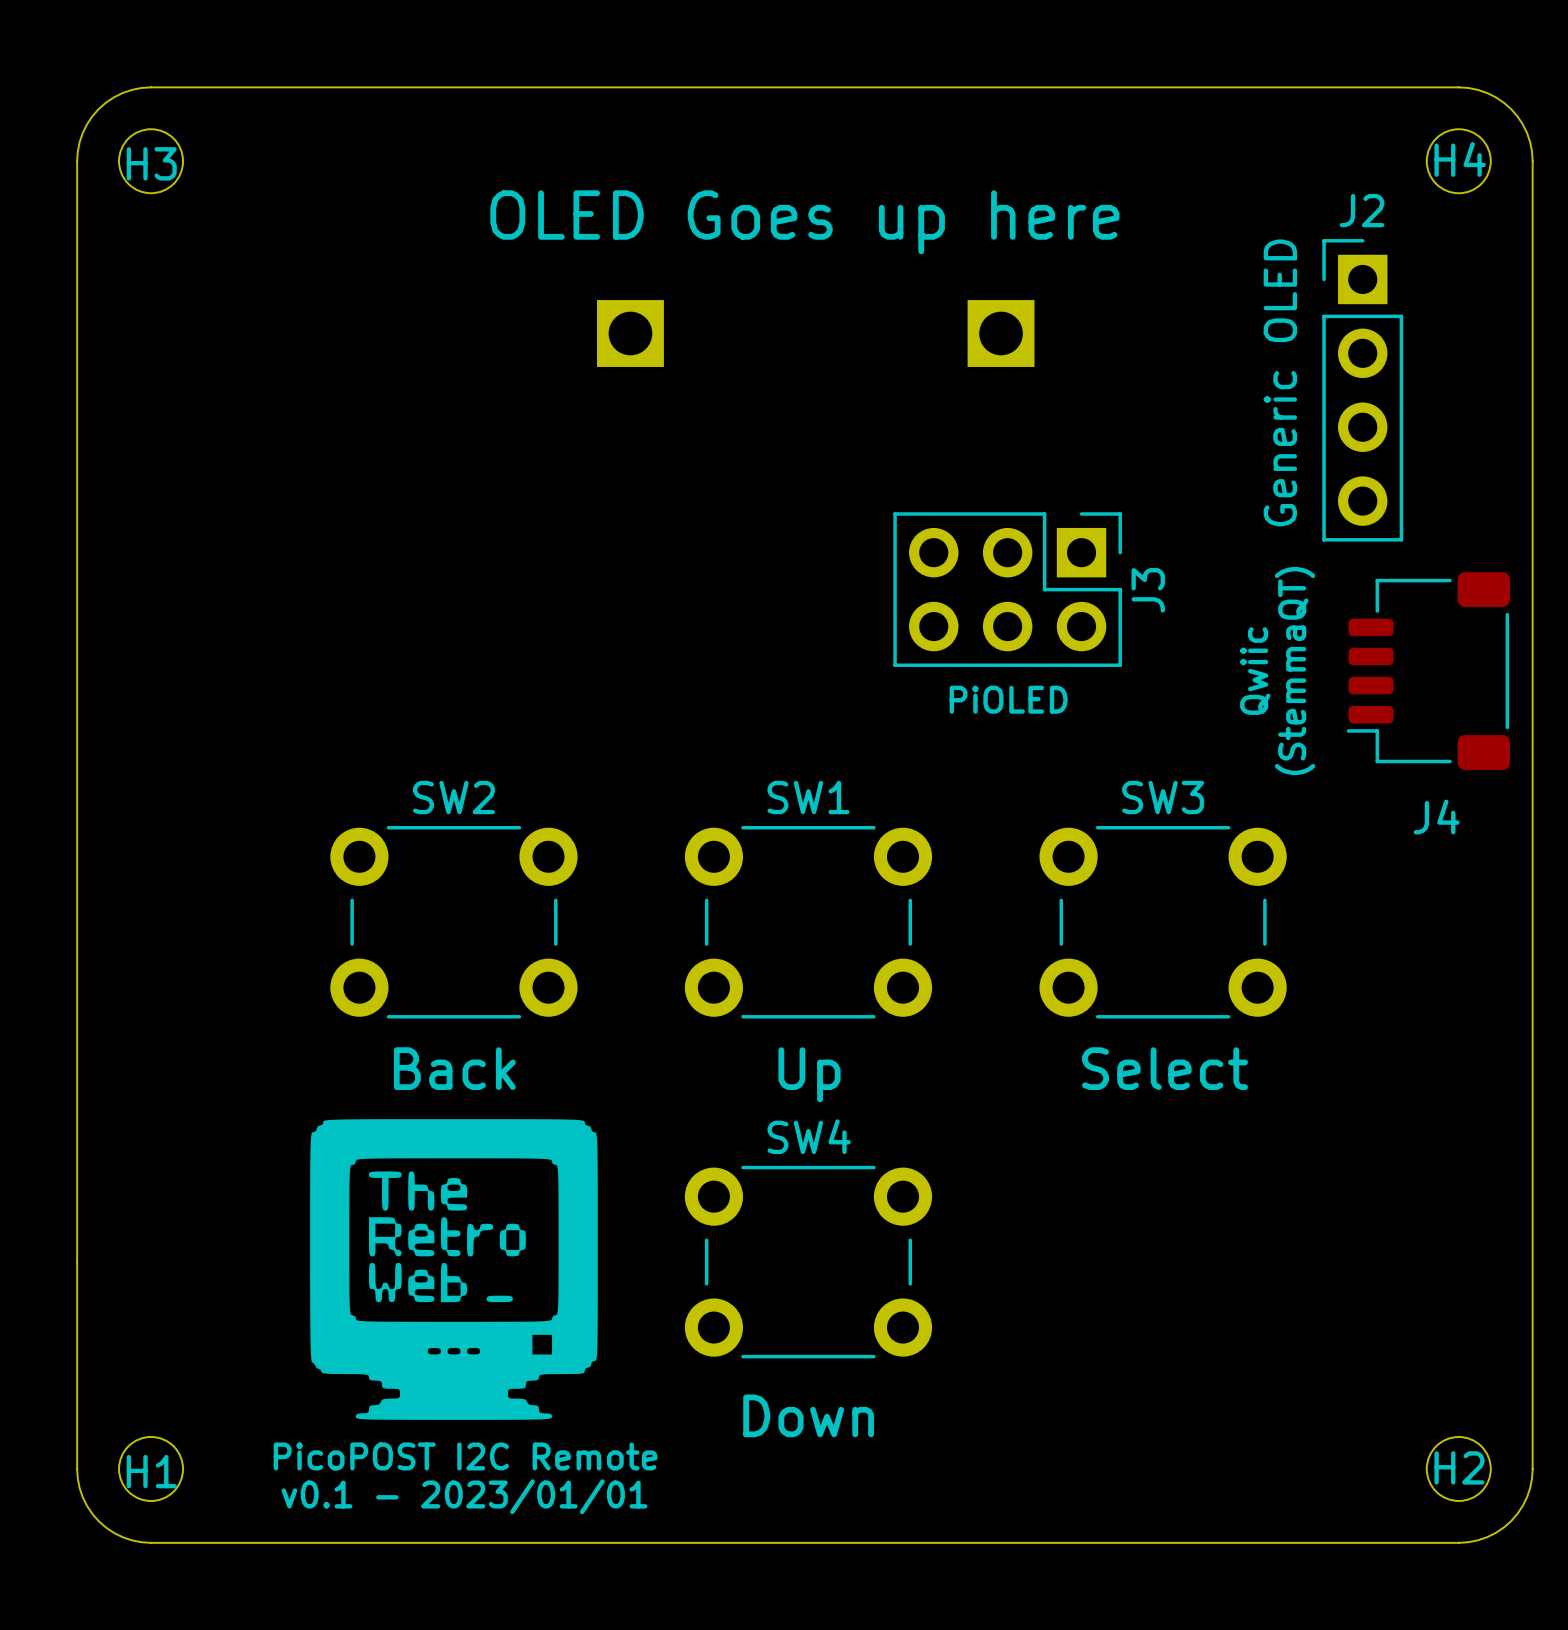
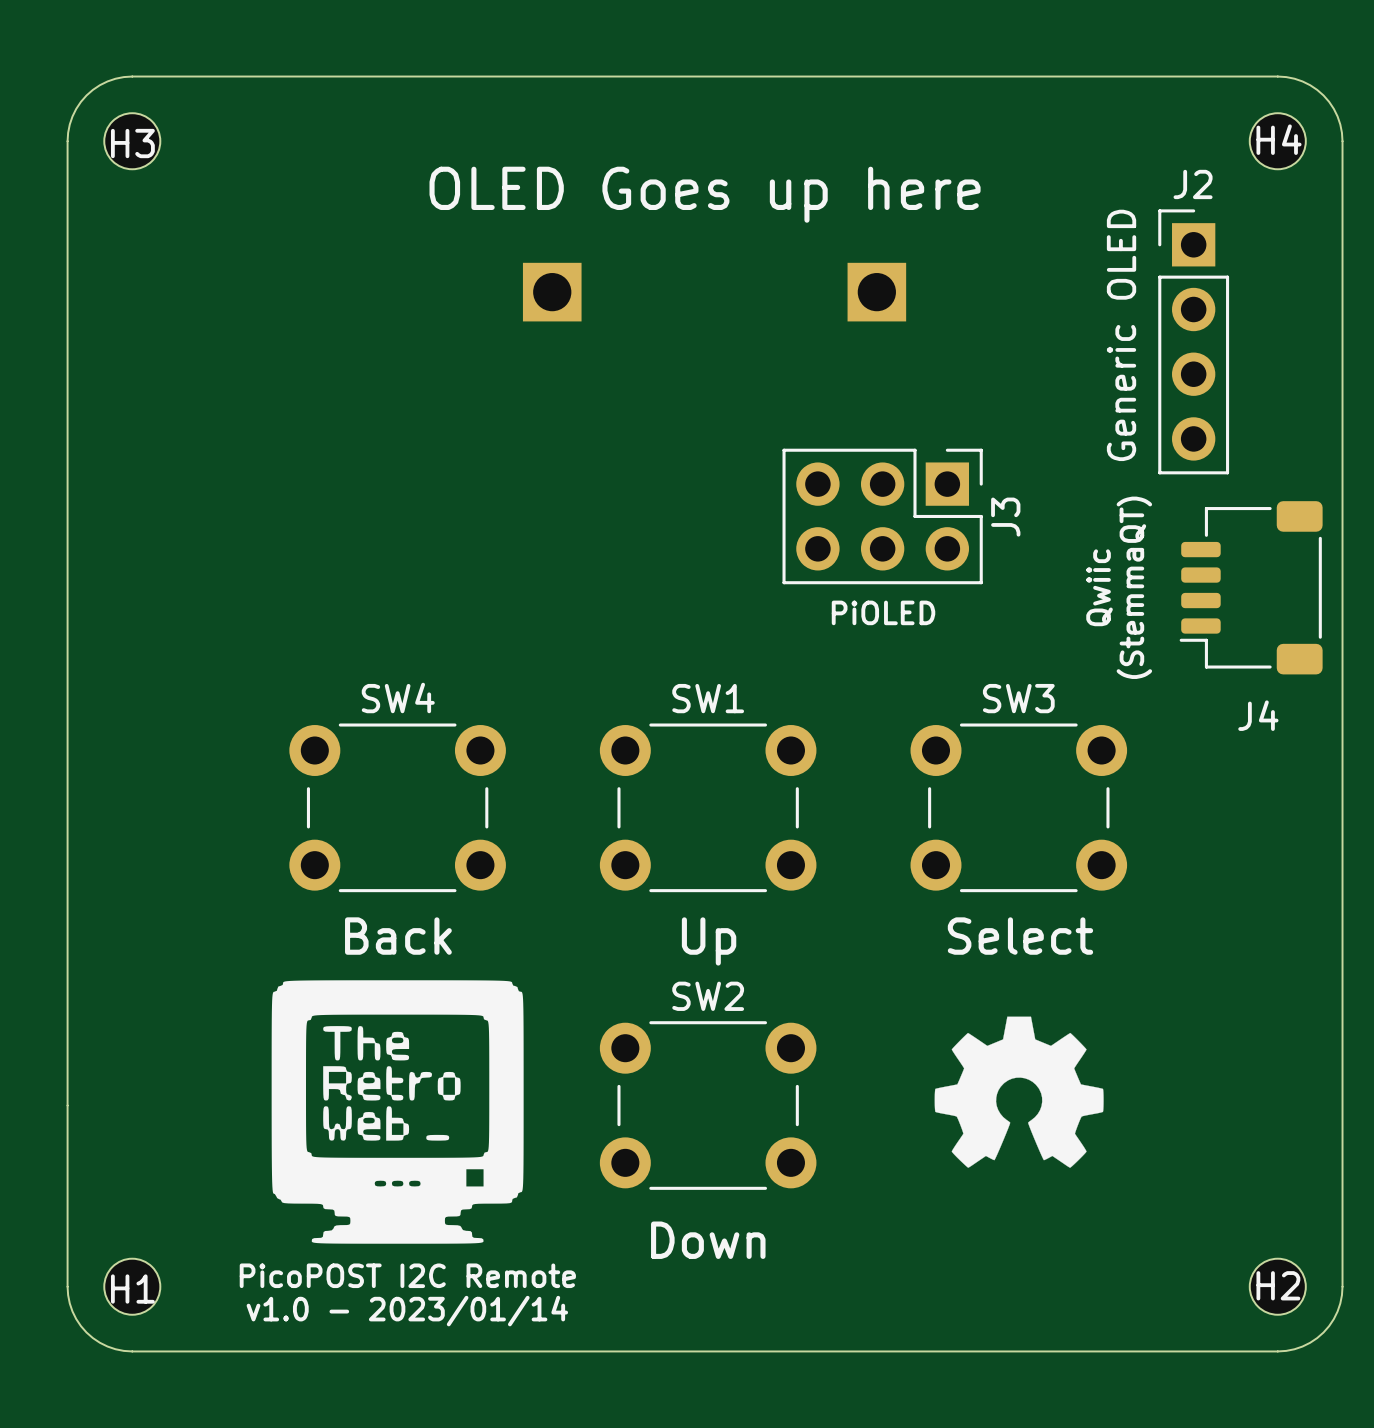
SW2 name: SW2 (453, 797) -> SW4 (398, 697)
SW4 name: SW4 (809, 1136) -> SW2 (708, 996)
drawing: none -> [934, 1016, 1104, 1168]
text: v0.1 - 2023/01/01 (464, 1496) -> v1.0 - 2023/01/14 (407, 1311)

